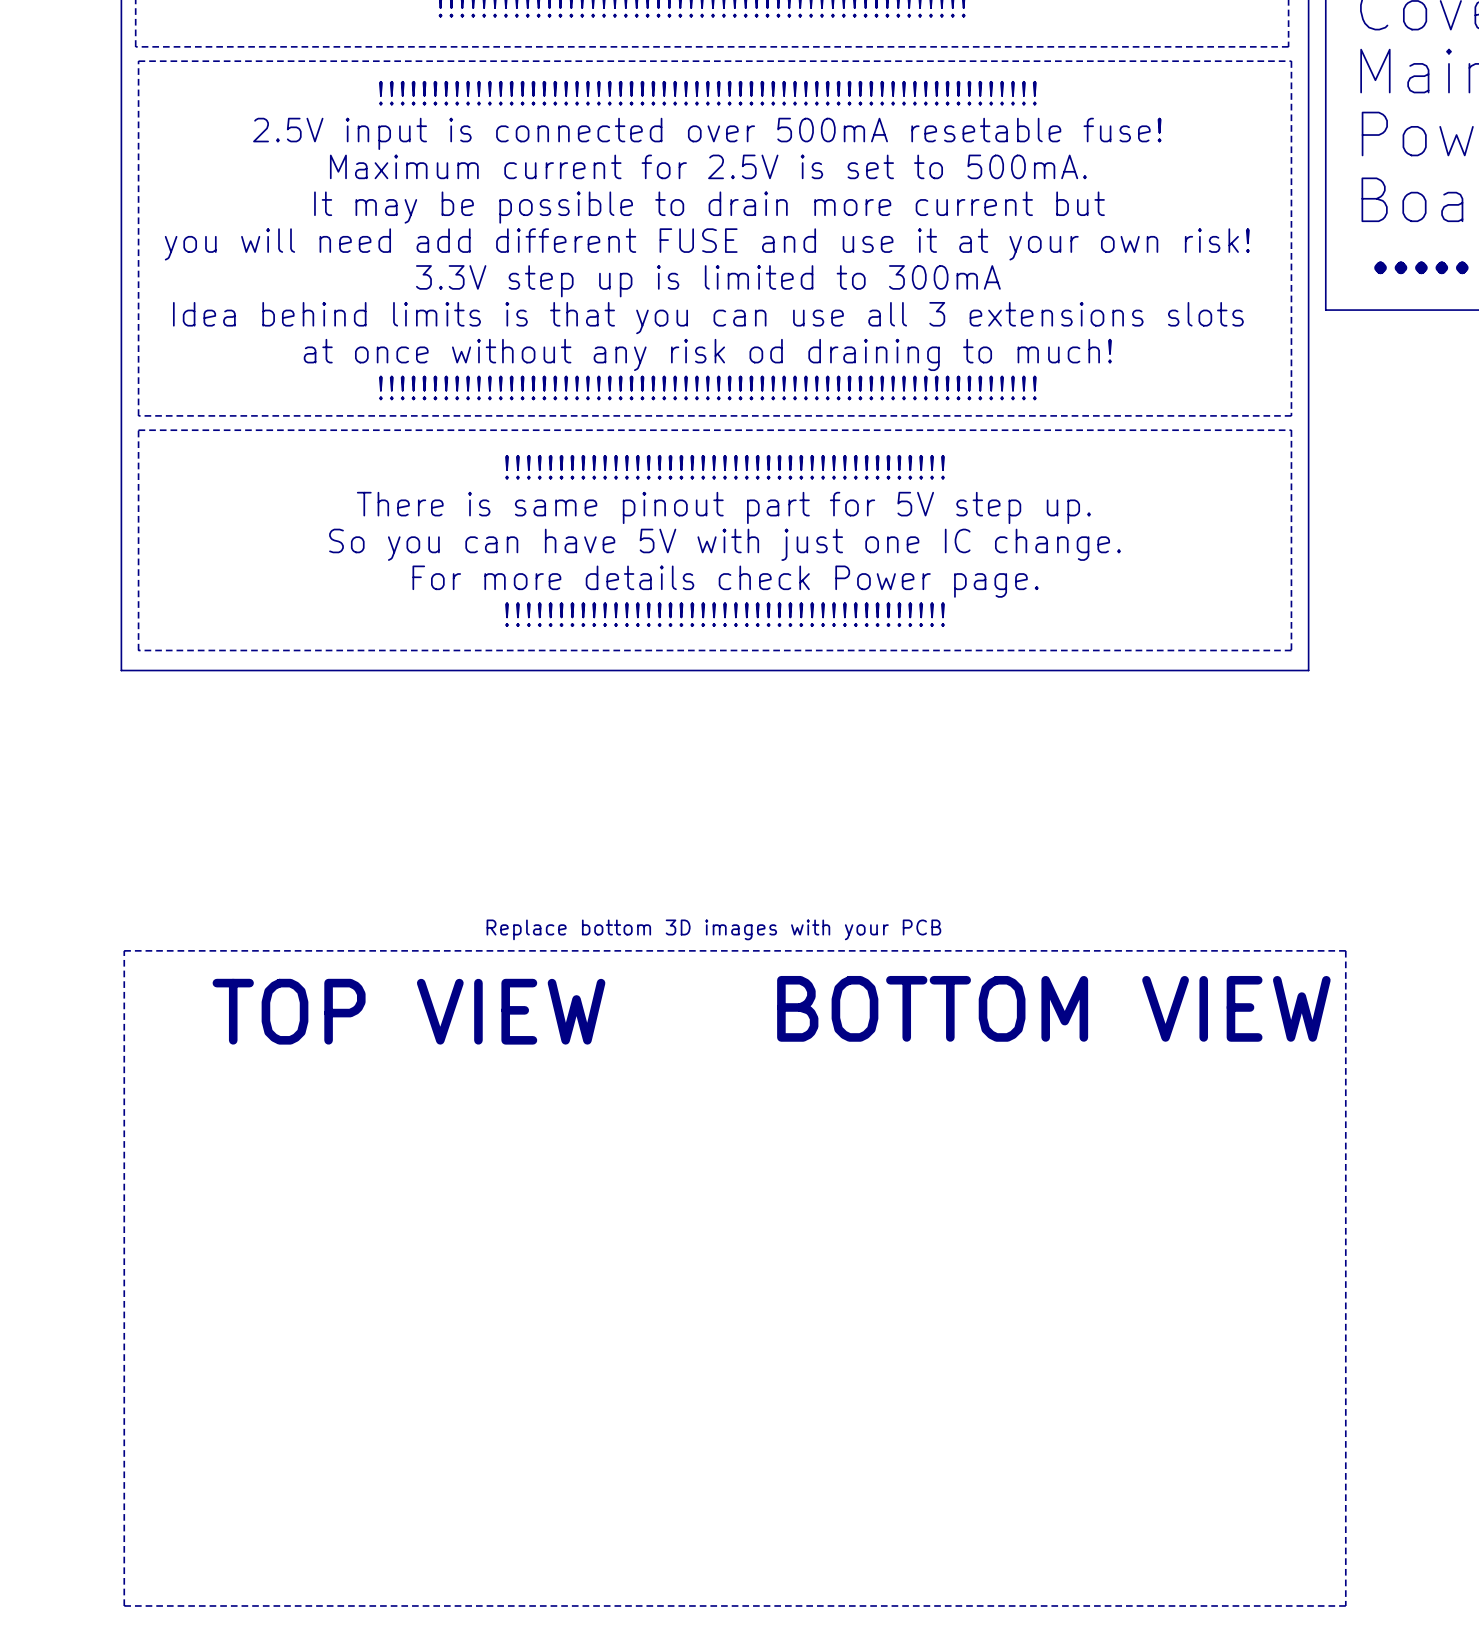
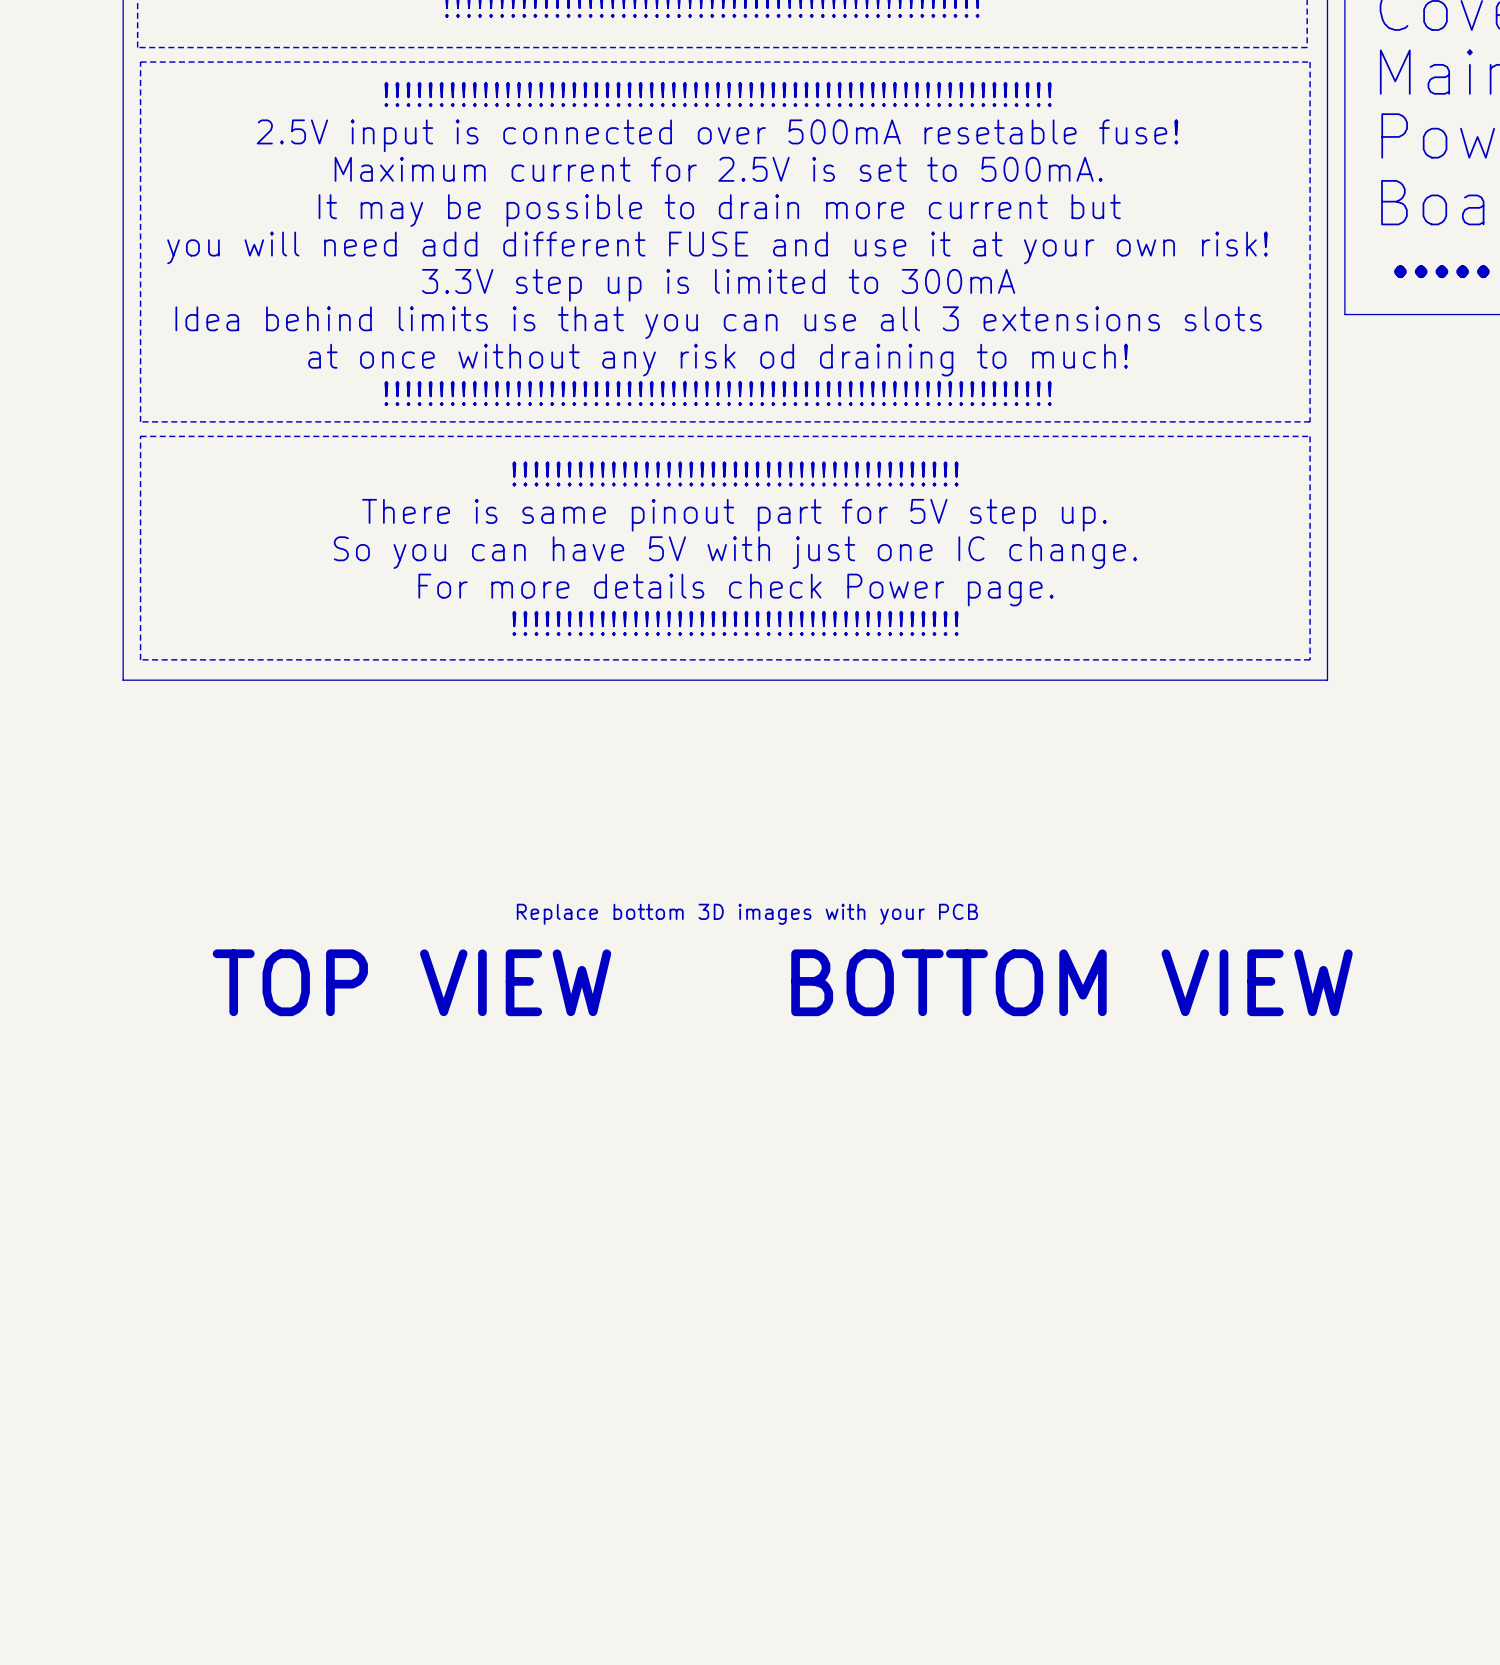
text position: Replace bottom 3D images with your PCB (713, 929) -> Replace bottom 3D images with your PCB (747, 914)
line: (124, 950) (1345, 950) (1345, 1605) (124, 1605) (124, 950) -> none
text position: BOTTOM VIEW (1053, 1008) -> BOTTOM VIEW (1071, 982)
text position: TOP VIEW (408, 1011) -> TOP VIEW (411, 982)

